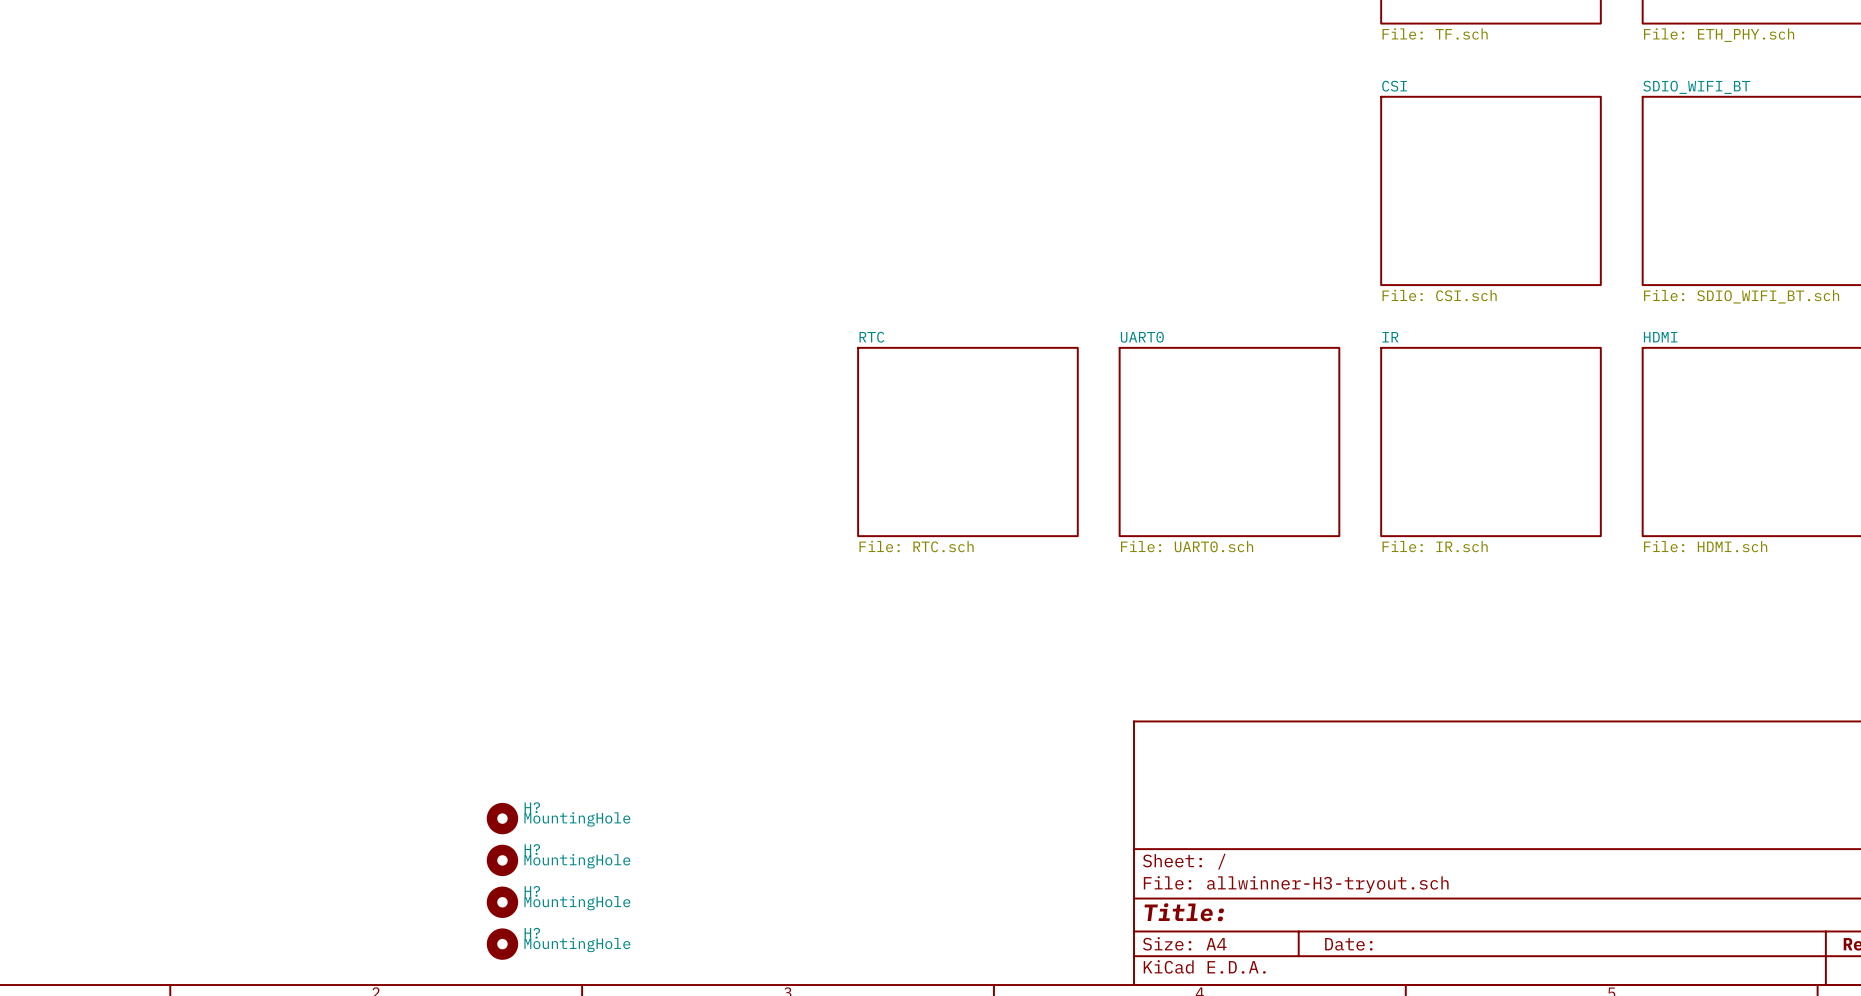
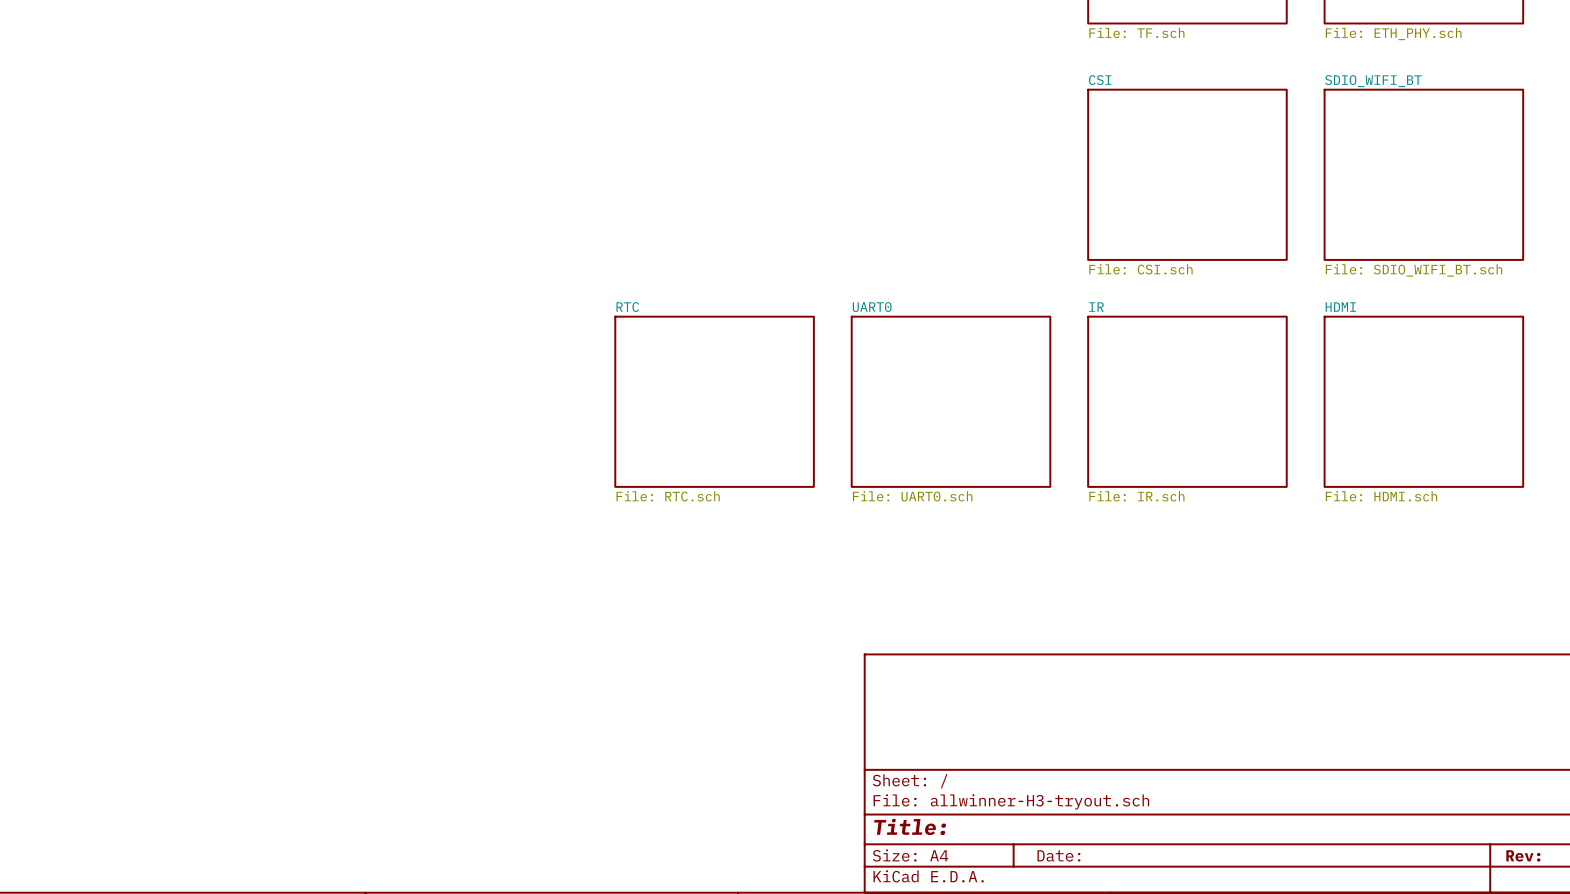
H?: MountingHole (502, 818) -> none
H?: MountingHole (502, 860) -> none
H?: MountingHole (502, 902) -> none
H?: MountingHole (502, 944) -> none

